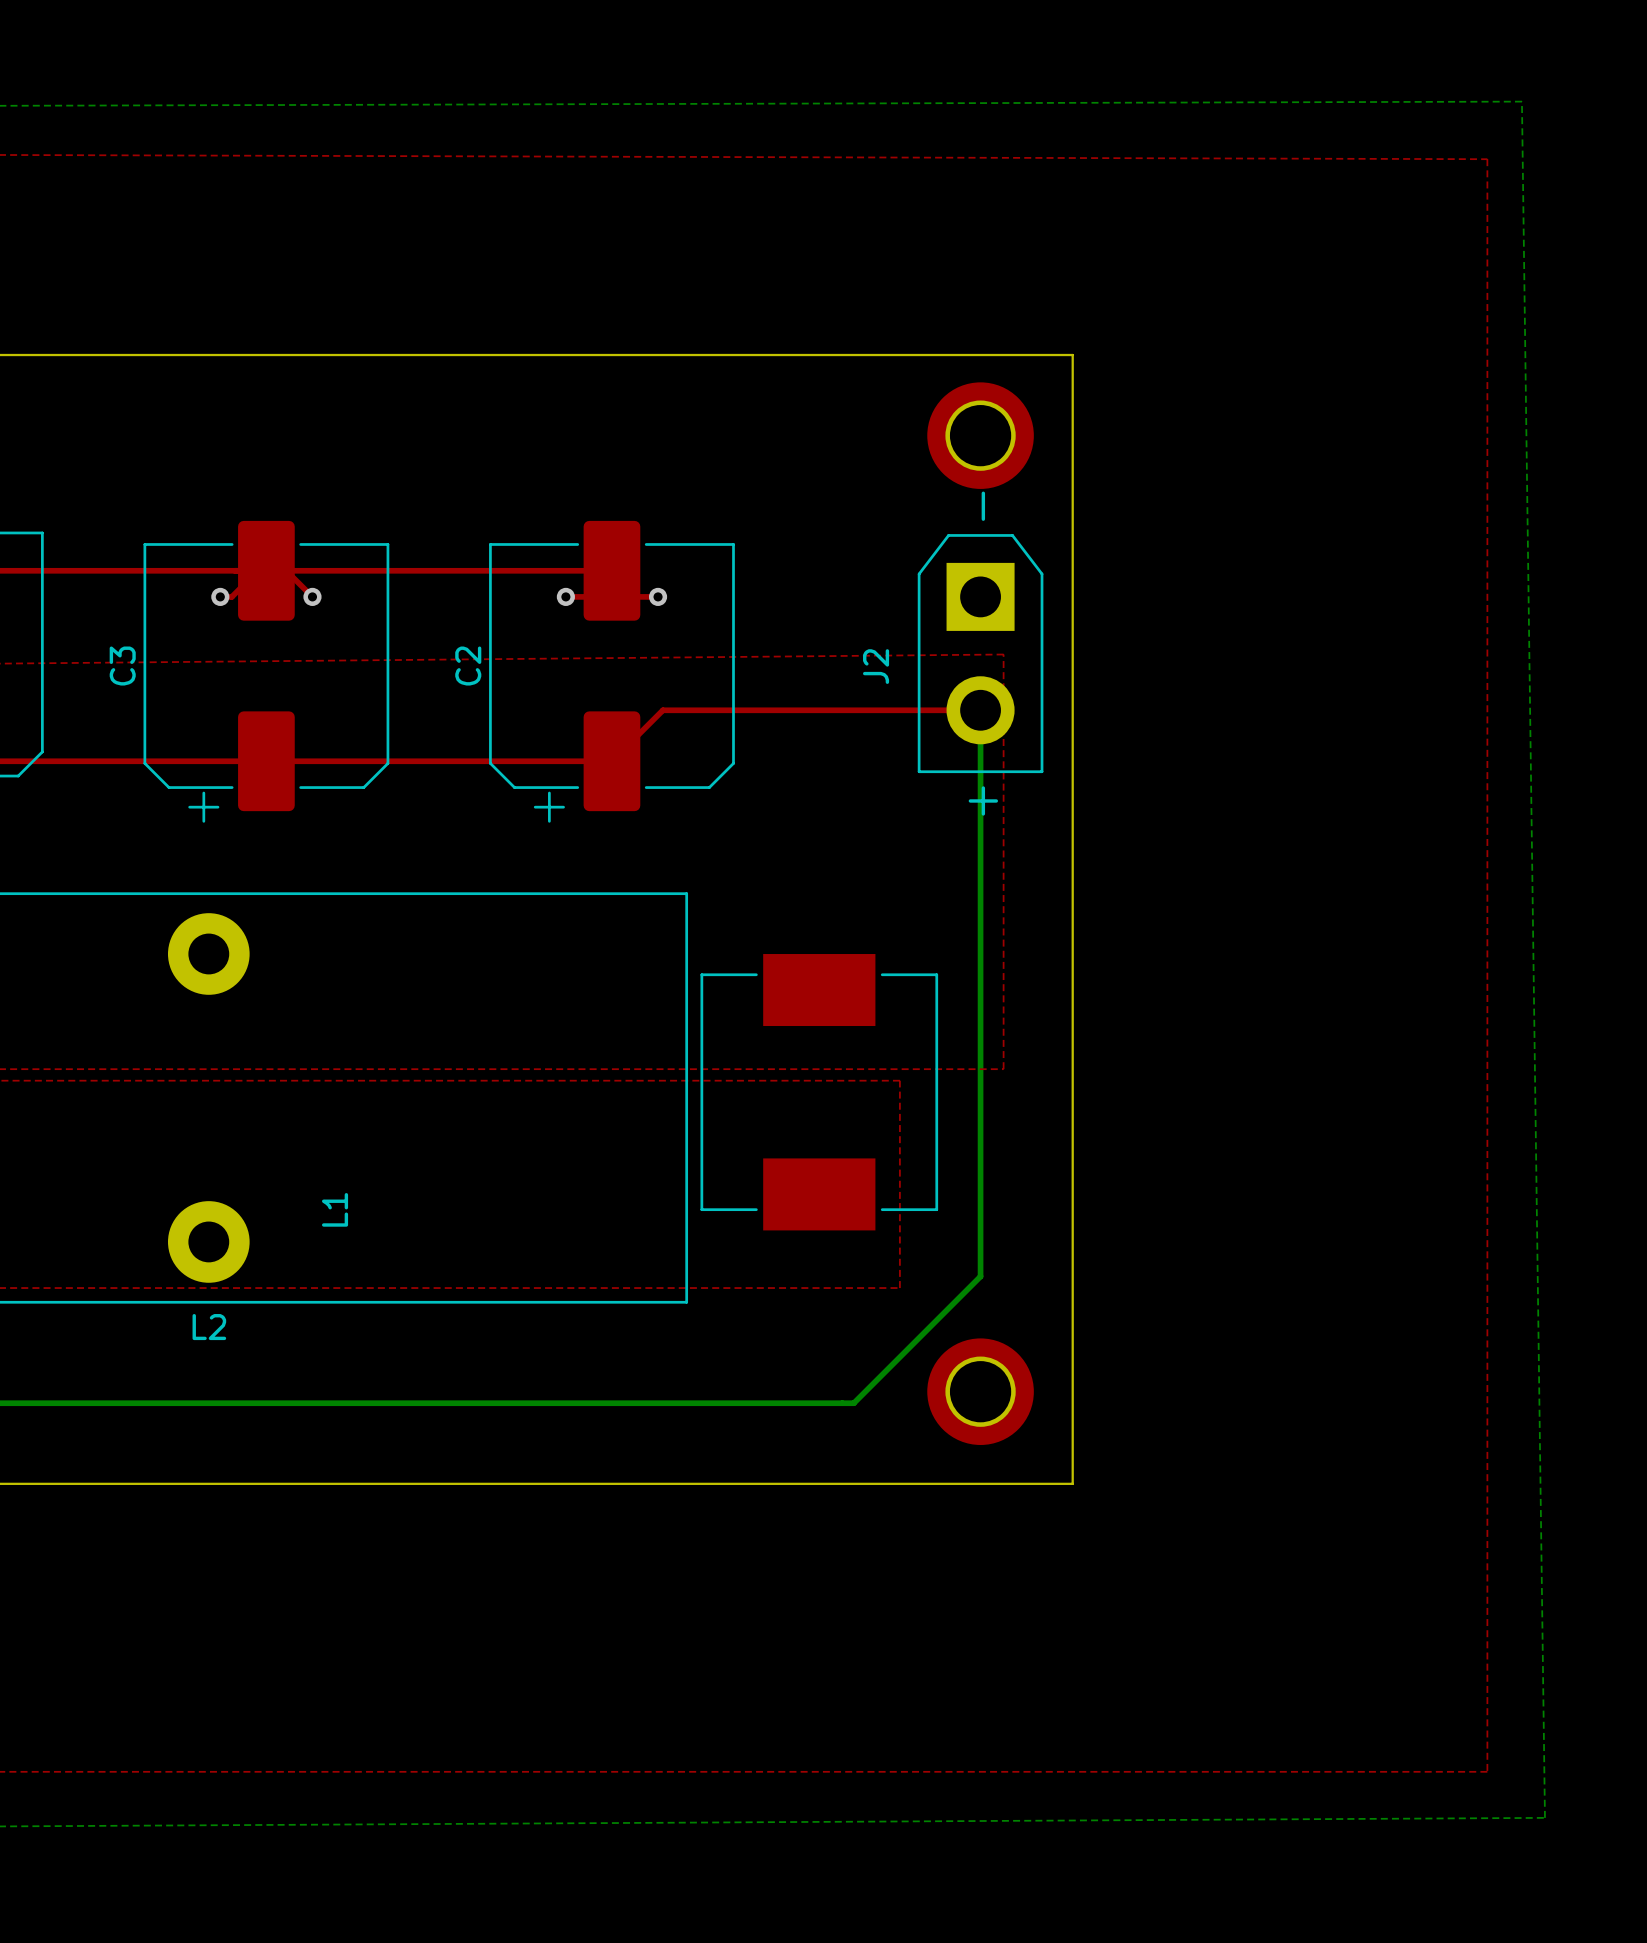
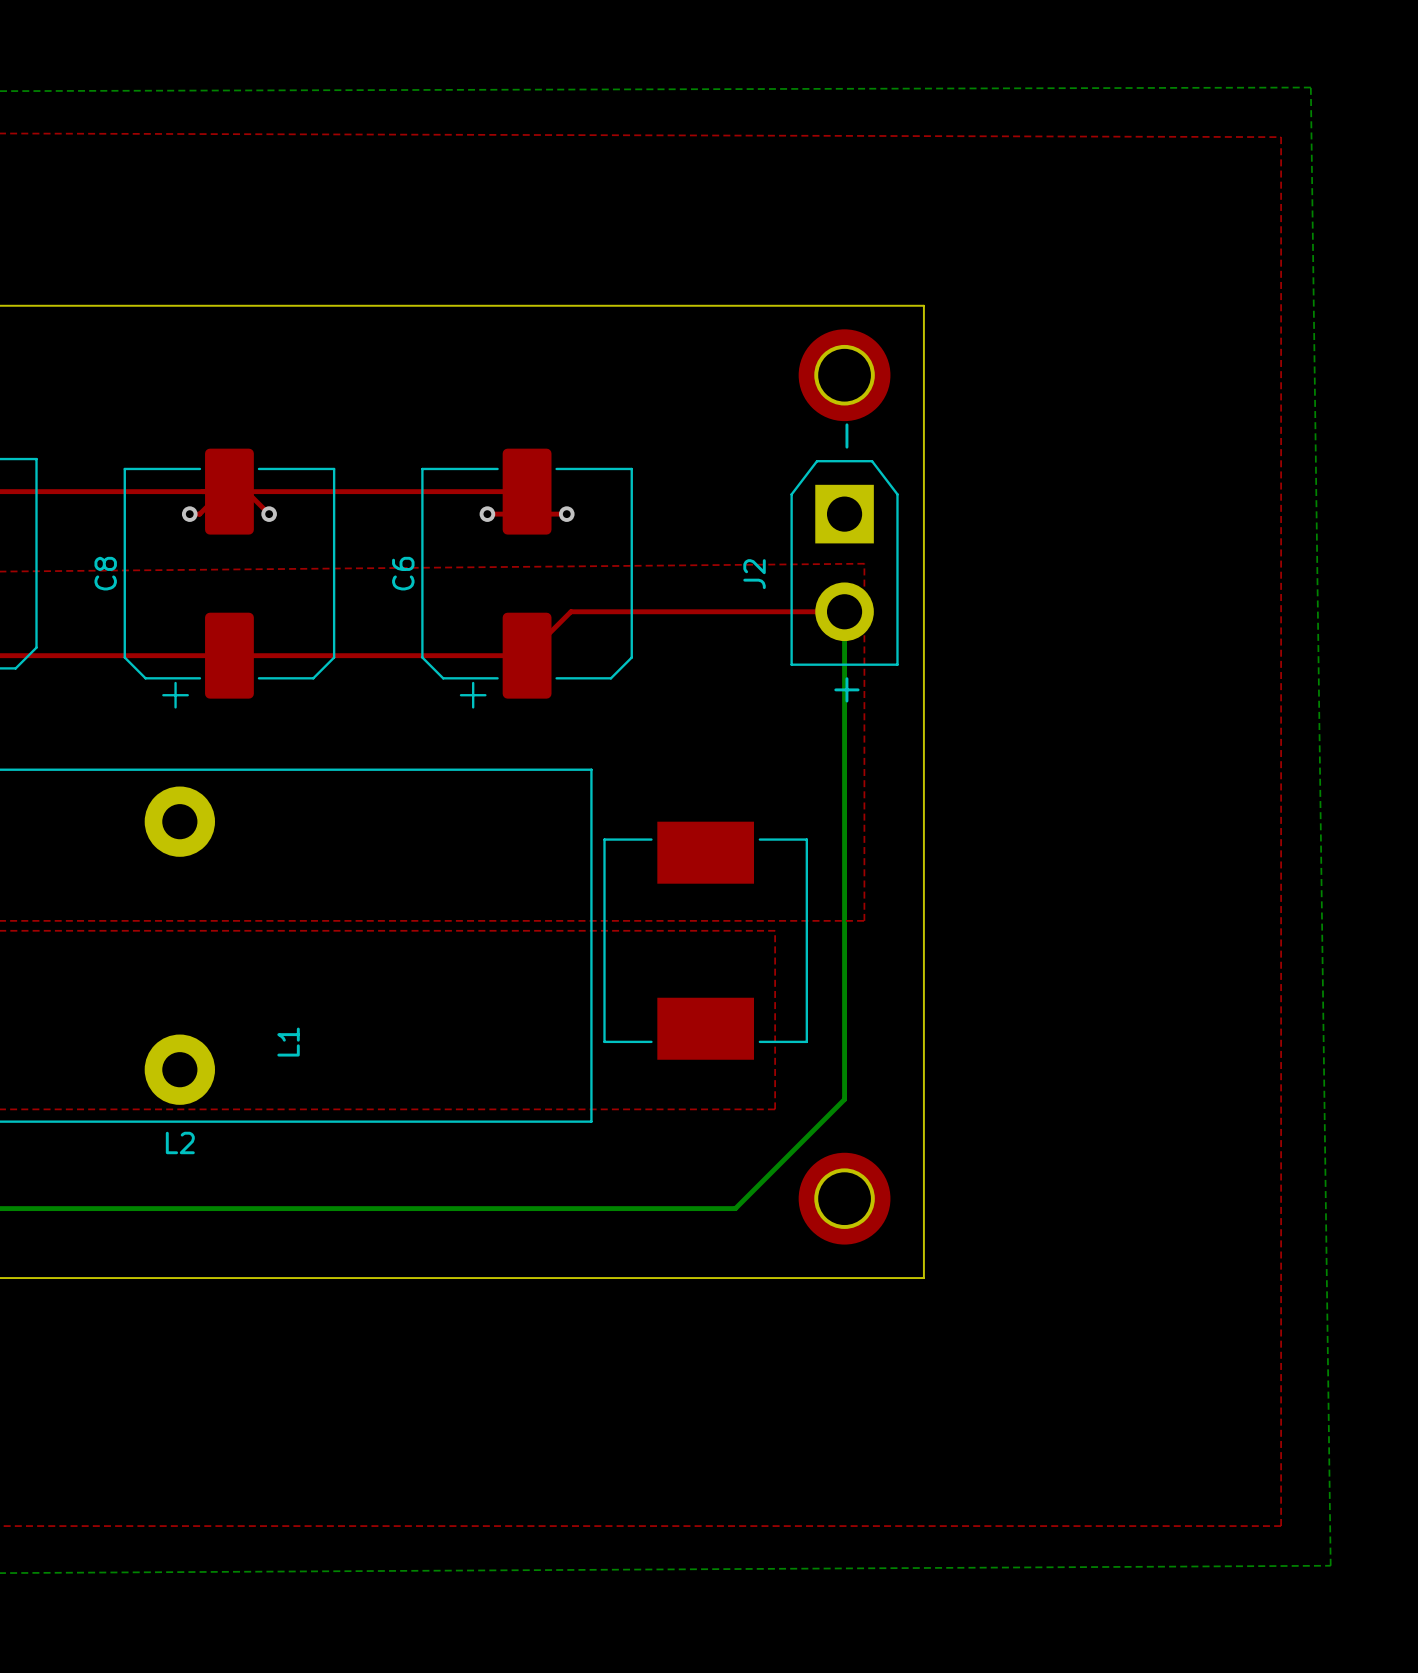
C3 name: C3 (122, 666) -> C8 (105, 573)
C2 name: C2 (468, 666) -> C6 (403, 573)

